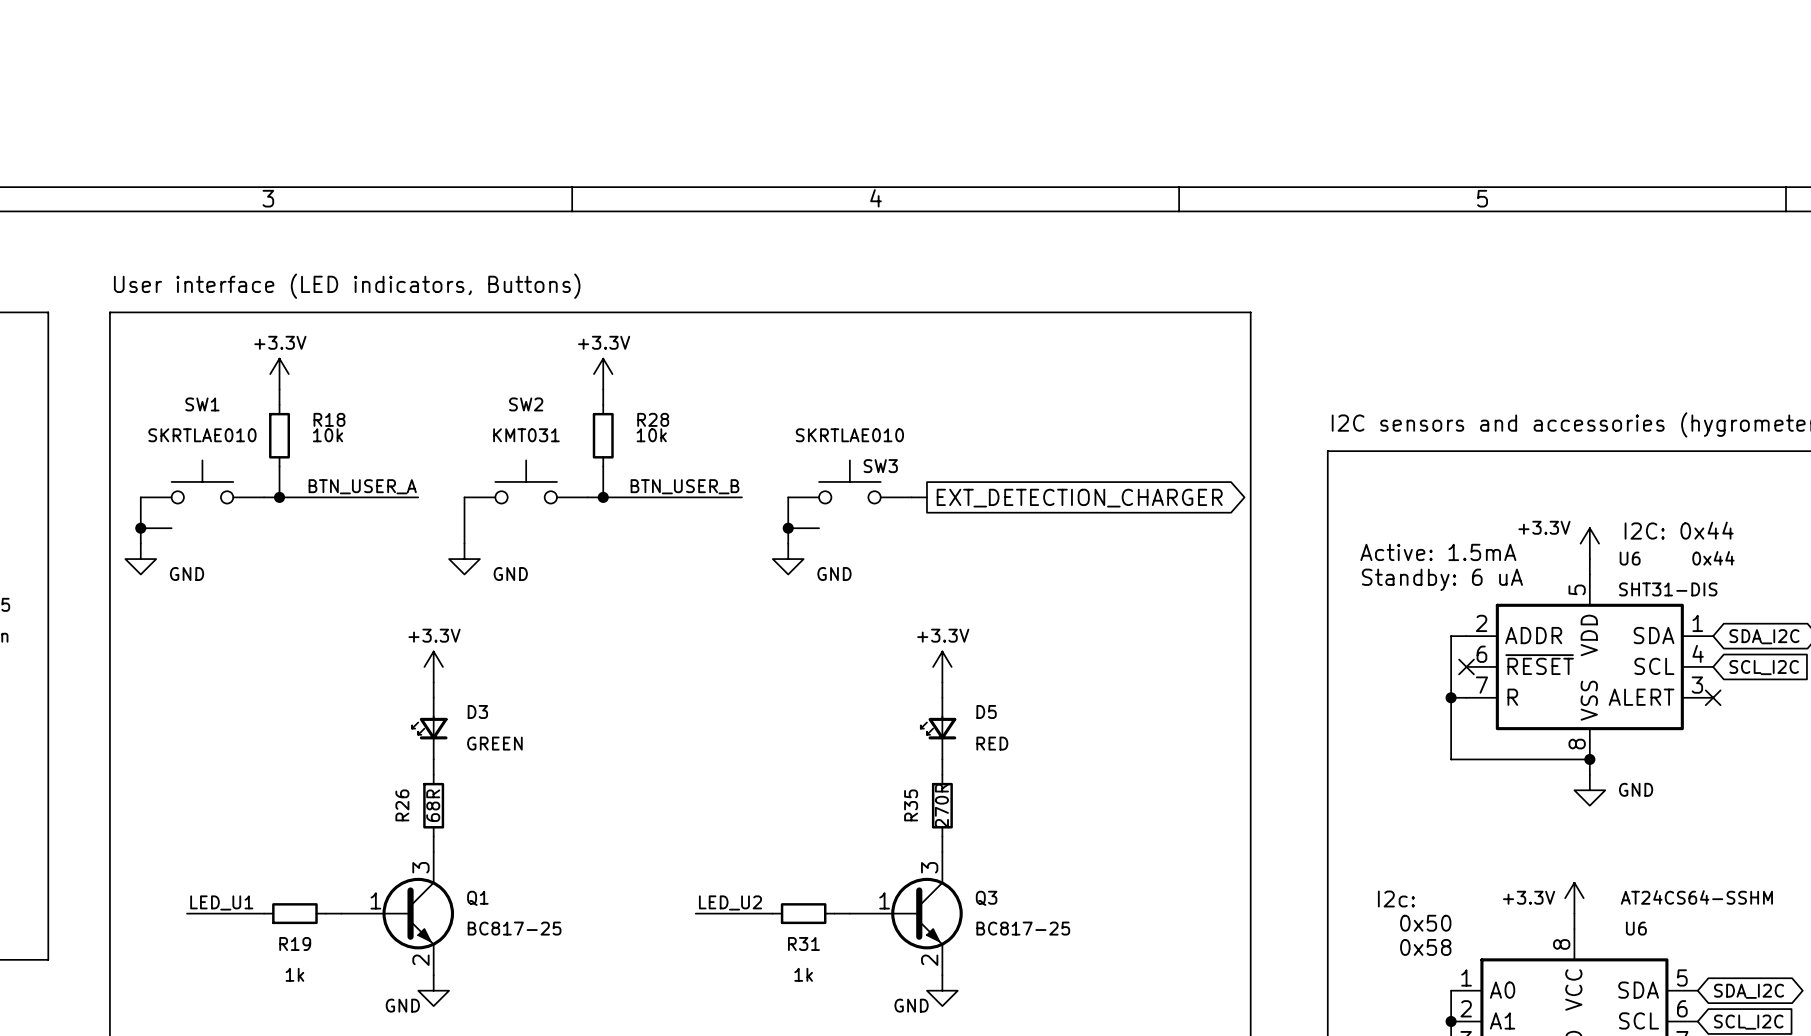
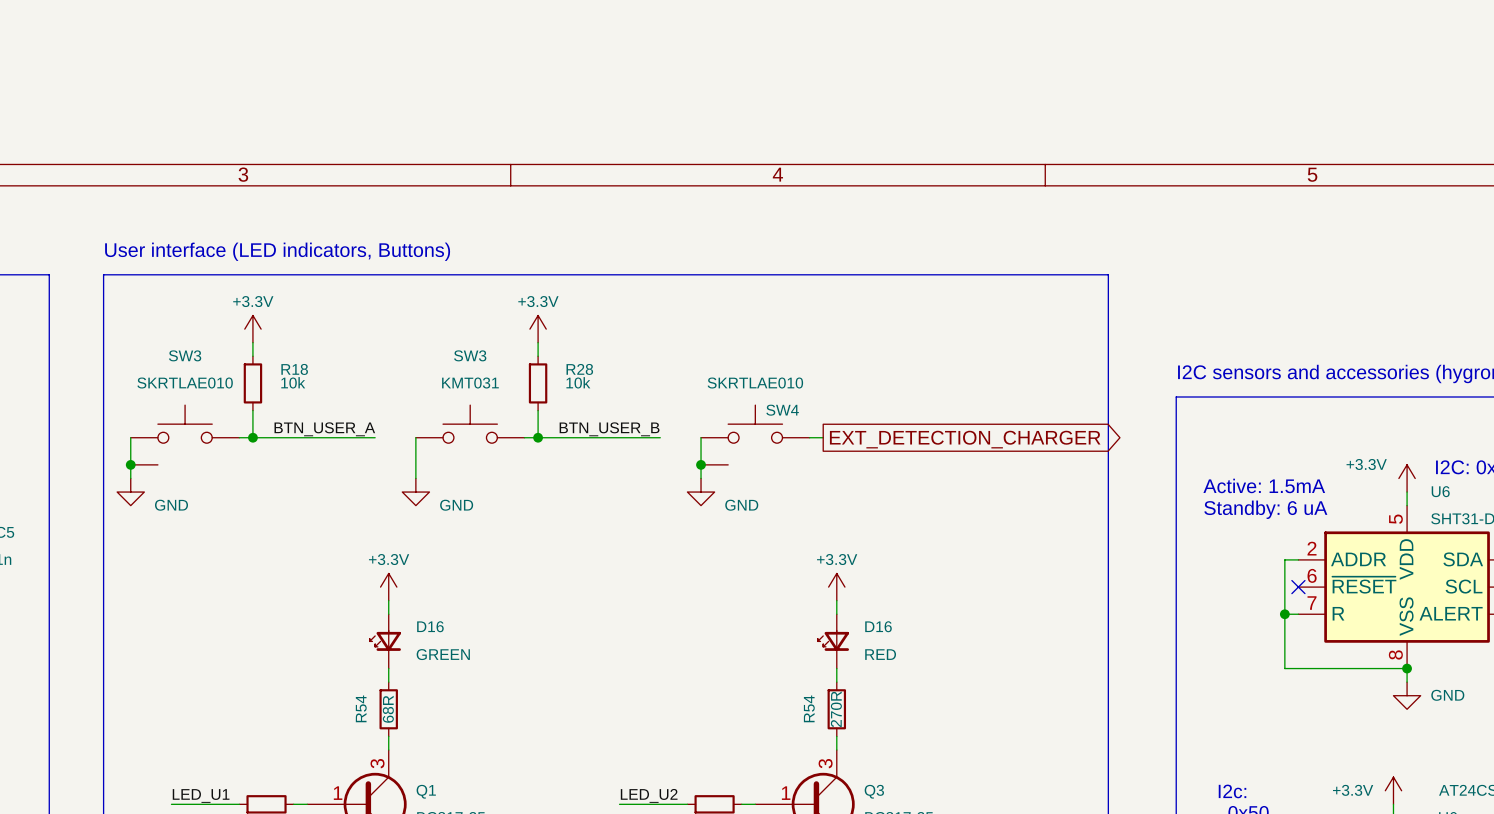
SW1 name: SW1 (202, 404) -> SW3 (185, 355)
SW2 name: SW2 (526, 404) -> SW3 (470, 355)
SW3 name: SW3 (880, 466) -> SW4 (782, 410)
D3 name: D3 (477, 711) -> D16 (430, 626)
D5 name: D5 (986, 711) -> D16 (878, 626)
R26 name: R26 (402, 805) -> R54 (361, 708)
R35 name: R35 (911, 805) -> R54 (809, 708)

